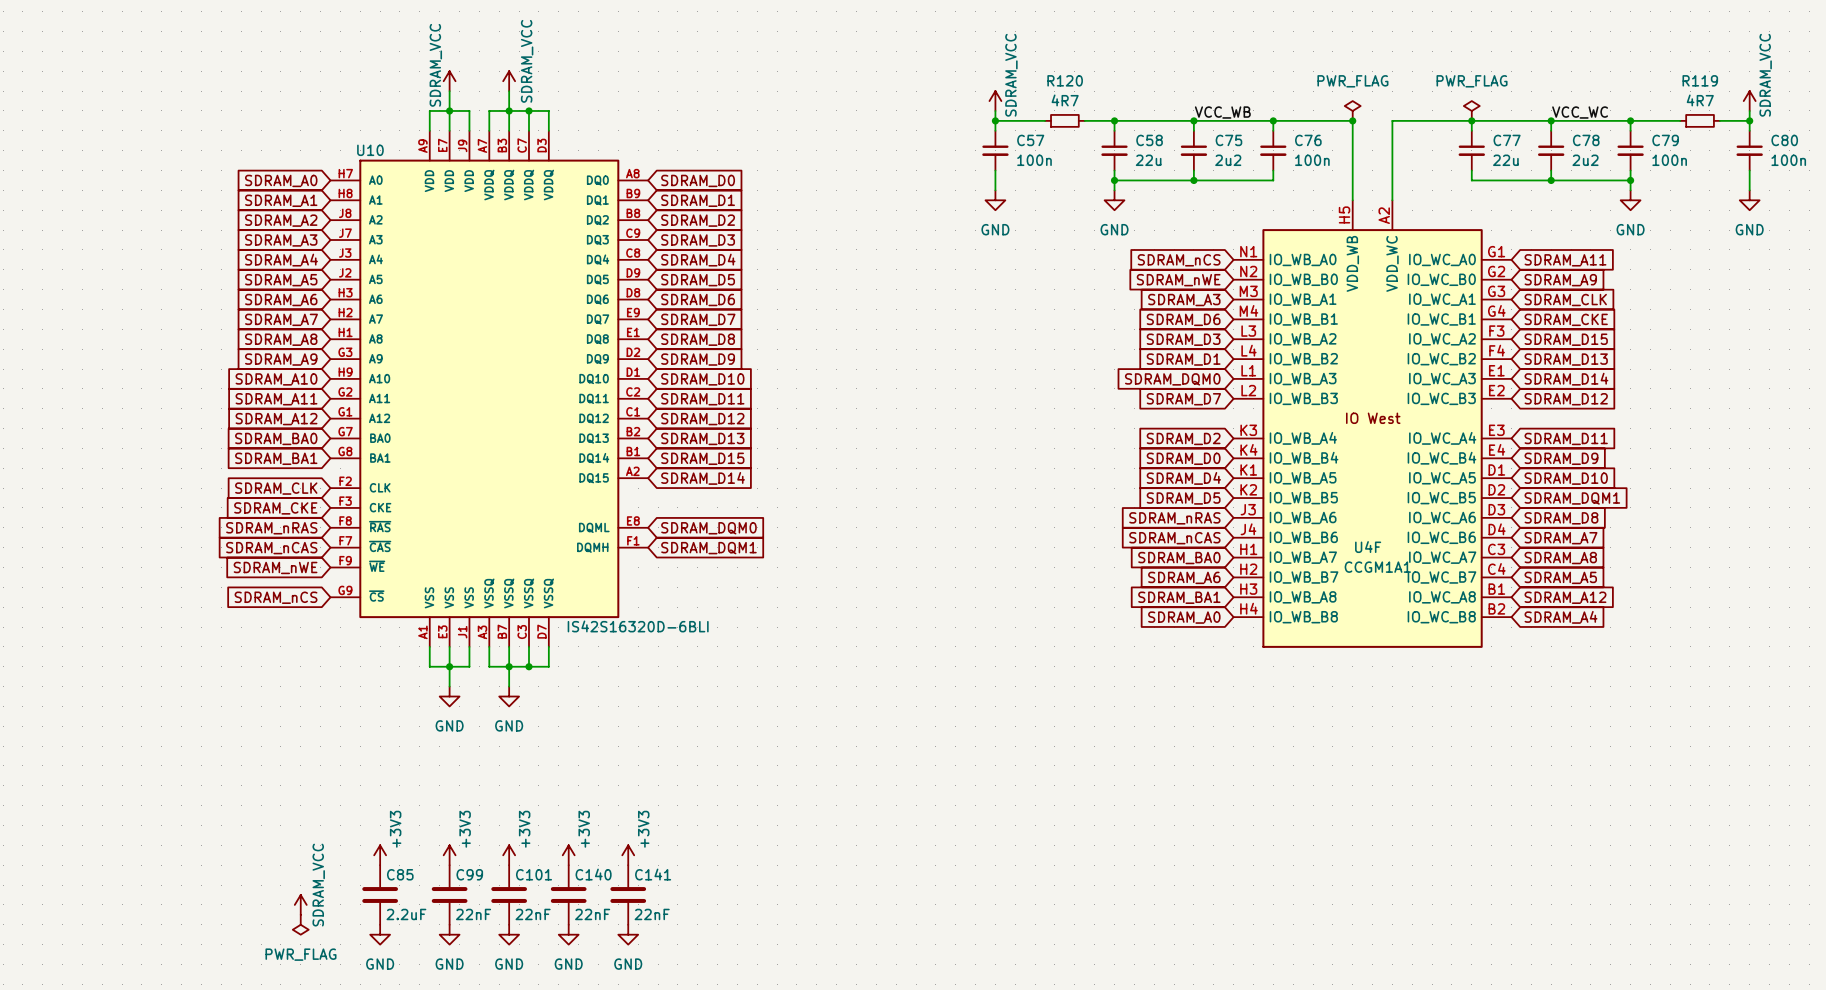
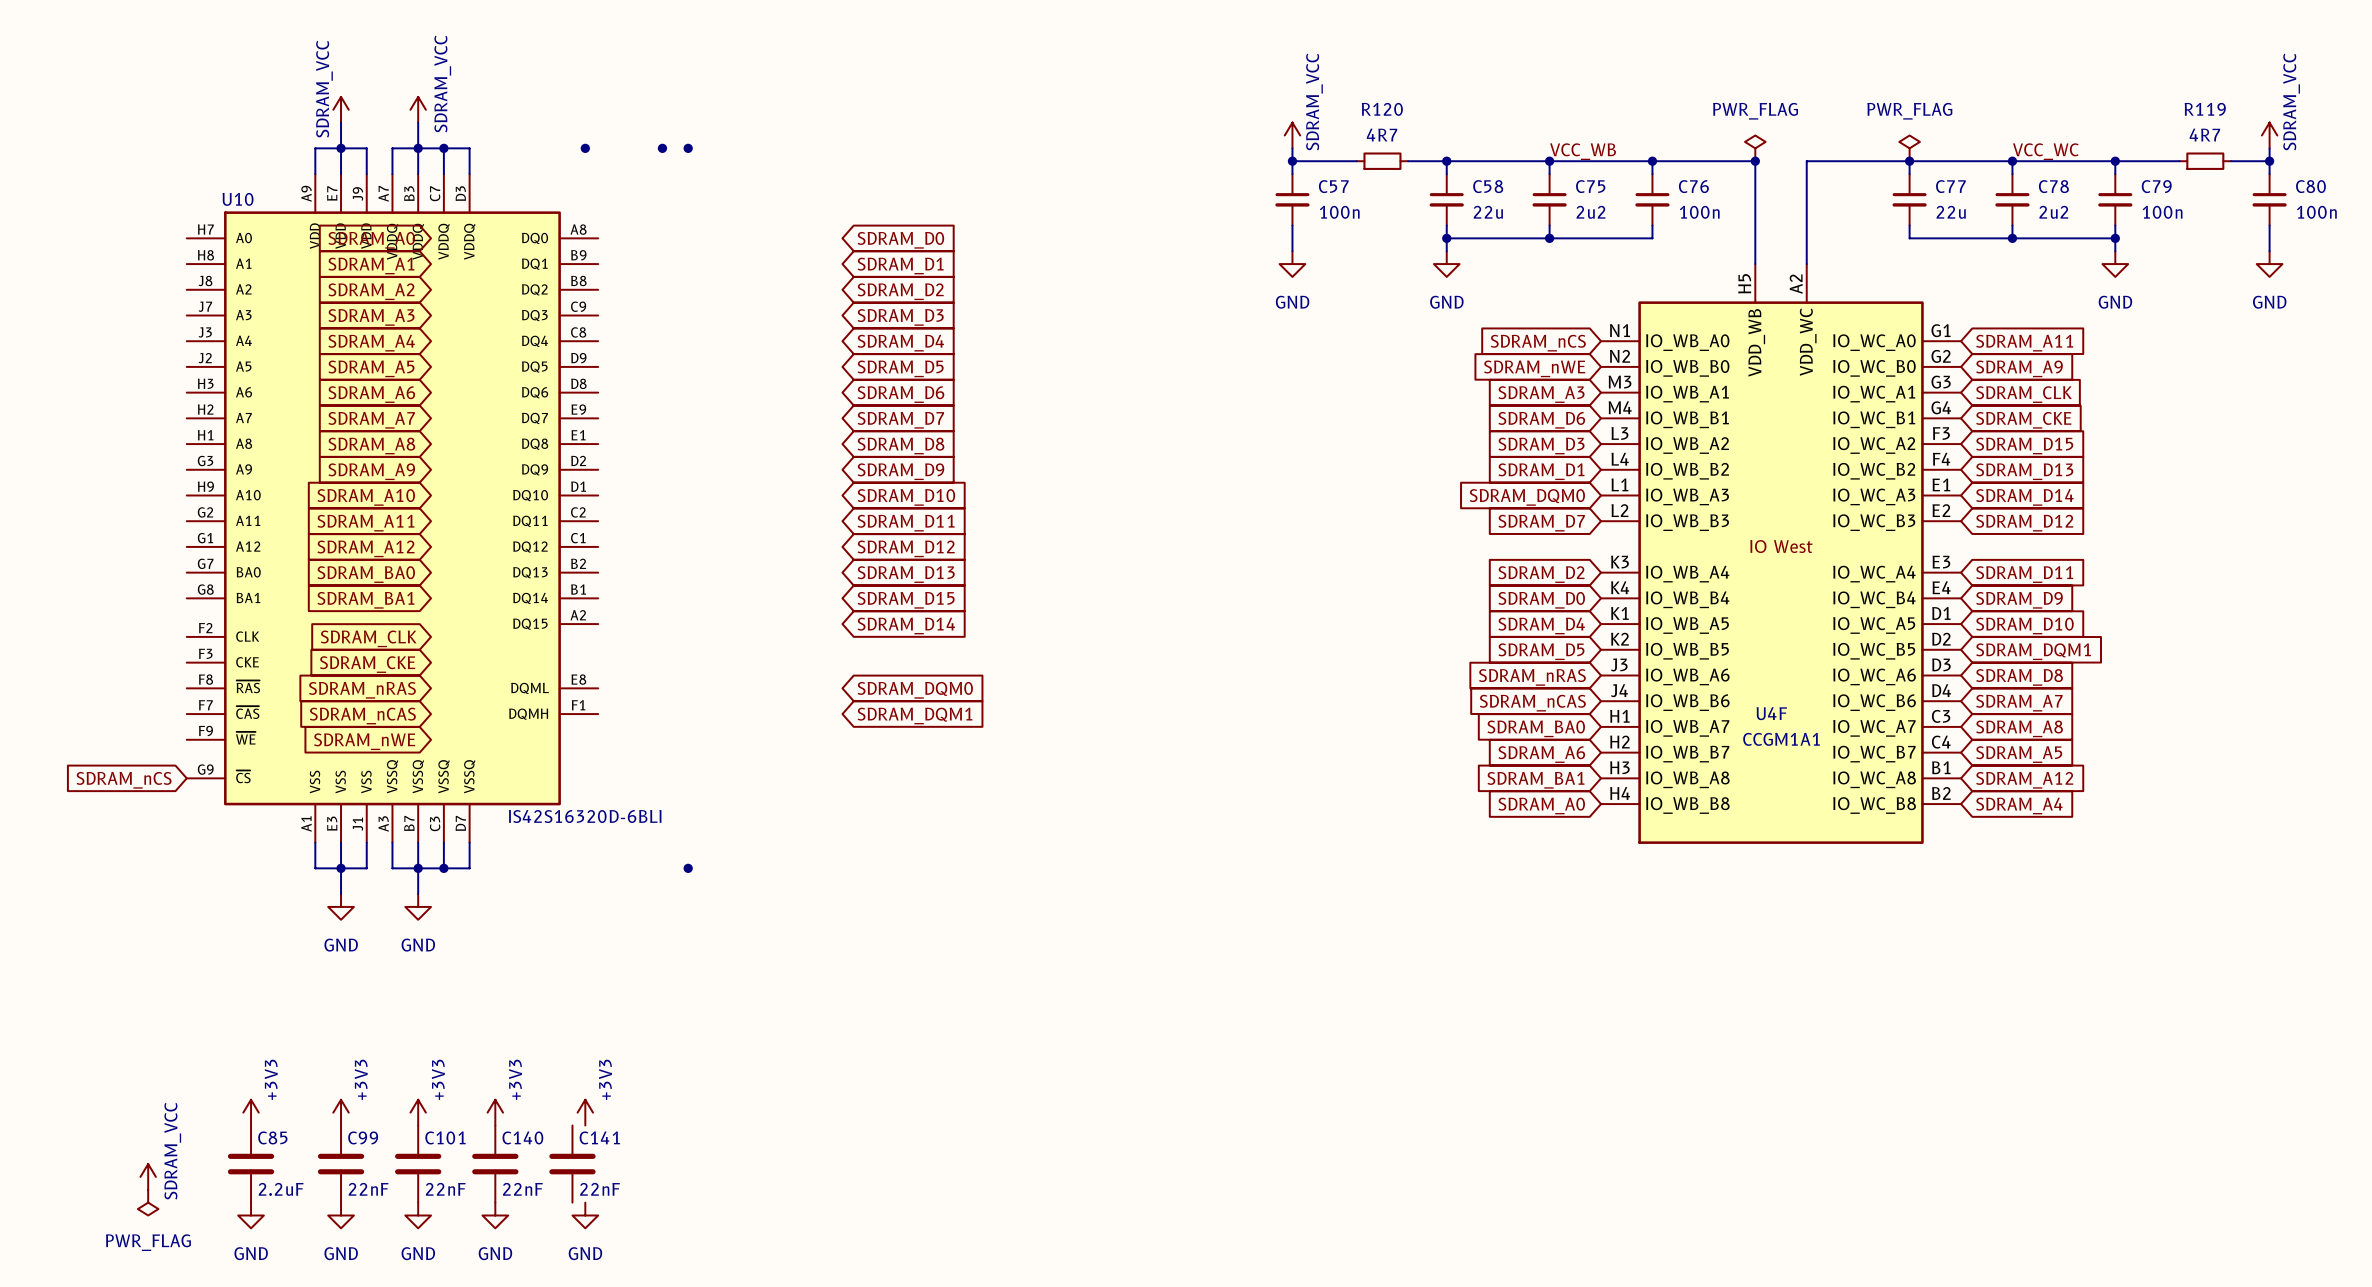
power symbol: none -> SDRAM_VCC (341, 109)
power symbol: none -> SDRAM_VCC (418, 109)
power symbol: SDRAM_VCC (449, 81) -> none
power symbol: SDRAM_VCC (509, 81) -> none
wire: (449, 91) (449, 130) -> (341, 122) (341, 174)
wire: (509, 91) (509, 130) -> (418, 122) (418, 174)
junction: none -> (341, 148)
junction: none -> (418, 148)
junction: none -> (443, 148)
wire: (529, 110) (529, 130) -> (443, 148) (443, 174)
wire: (429, 130) (429, 110) (469, 110) (469, 130) -> (315, 174) (315, 148) (366, 148) (366, 174)
wire: (489, 130) (489, 110) (548, 110) (548, 130) -> (392, 174) (392, 148) (469, 148) (469, 174)
U10 position: (489, 388) -> (392, 508)
global label position: SDRAM_nCS (276, 597) -> SDRAM_nCS (124, 780)
wire: (429, 646) (429, 666) (469, 666) (469, 646) -> (315, 842) (315, 868) (366, 868) (366, 842)
wire: (449, 646) (449, 686) -> (341, 842) (341, 894)
wire: (489, 646) (489, 666) (548, 666) (548, 646) -> (392, 842) (392, 868) (469, 868) (469, 842)
wire: (509, 646) (509, 686) -> (418, 842) (418, 894)
wire: (529, 646) (529, 666) -> (443, 842) (443, 868)
junction: none -> (341, 868)
junction: none -> (418, 868)
junction: none -> (443, 868)
junction: (449, 666) -> none
junction: (509, 666) -> none
power symbol: none -> GND (341, 906)
power symbol: none -> GND (418, 906)
power symbol: GND (449, 696) -> none
power symbol: GND (509, 696) -> none
power symbol: none -> +3V3 (251, 1112)
power symbol: none -> +3V3 (341, 1112)
power symbol: none -> +3V3 (418, 1112)
power symbol: +3V3 (509, 855) -> none
power symbol: +3V3 (568, 855) -> none
power symbol: +3V3 (628, 855) -> none
C85 name: C85 (400, 874) -> C140 (522, 1137)
C85: none -> 2.2uF (251, 1164)
C99 position: (449, 894) -> (341, 1164)
C101 position: (509, 894) -> (418, 1164)
C140: 22nF (568, 894) -> none
C141 position: (628, 894) -> (572, 1164)
power symbol position: SDRAM_VCC (300, 904) -> SDRAM_VCC (148, 1176)
C85 value: 2.2uF (406, 914) -> 22nF (522, 1189)
power symbol position: PWR_FLAG (300, 924) -> PWR_FLAG (148, 1202)
power symbol: none -> GND (251, 1215)
power symbol: none -> GND (341, 1215)
power symbol: none -> GND (418, 1215)
power symbol: GND (509, 934) -> none
power symbol: GND (568, 934) -> none
power symbol: GND (628, 934) -> none

